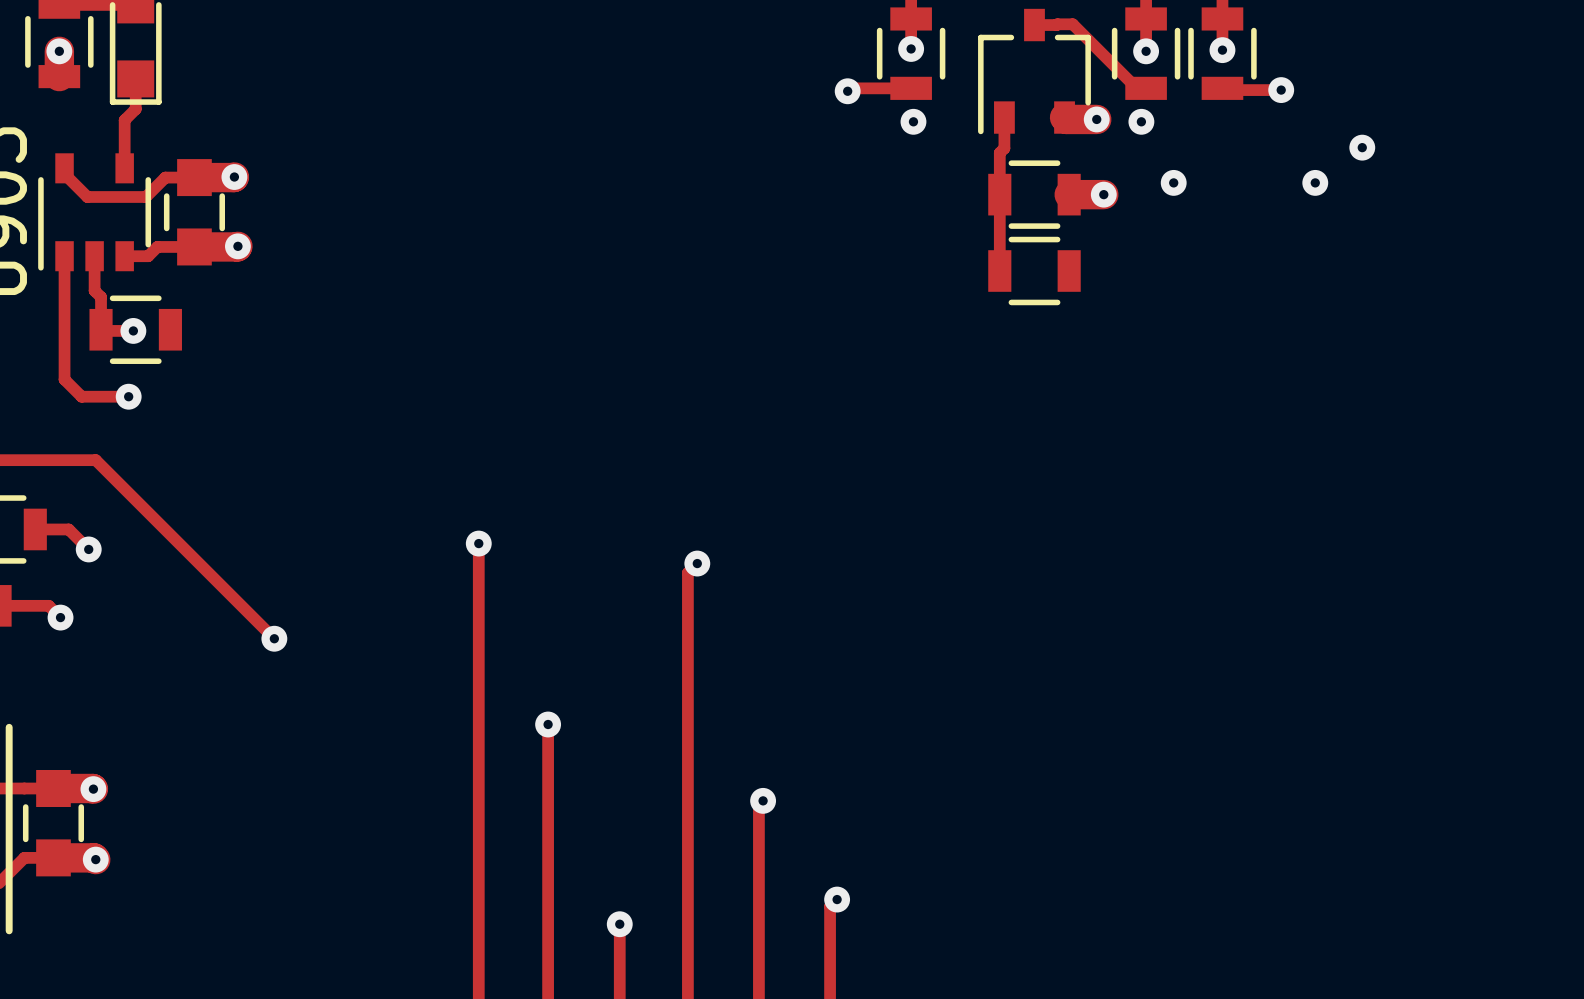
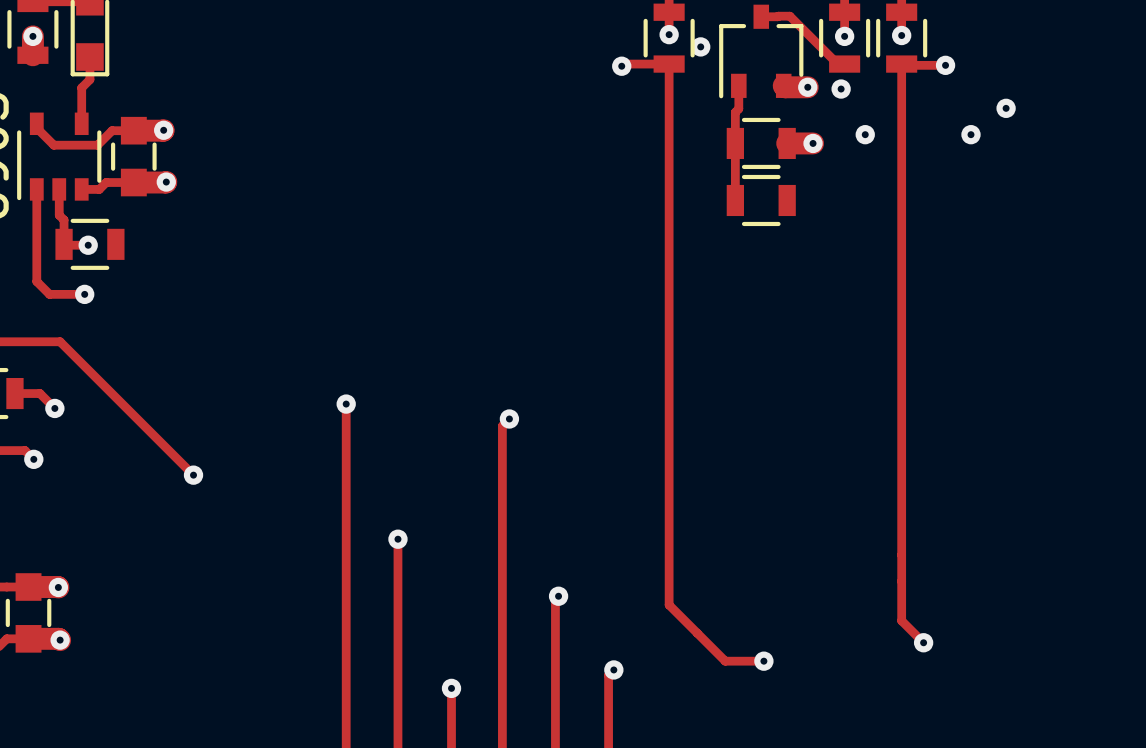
track: none -> (669, 64) (669, 605) (725, 661) (763, 661)
track: none -> (901, 64) (901, 620) (923, 642)
via position: (913, 121) -> (700, 46)
via: none -> (923, 642)
via: none -> (763, 661)

